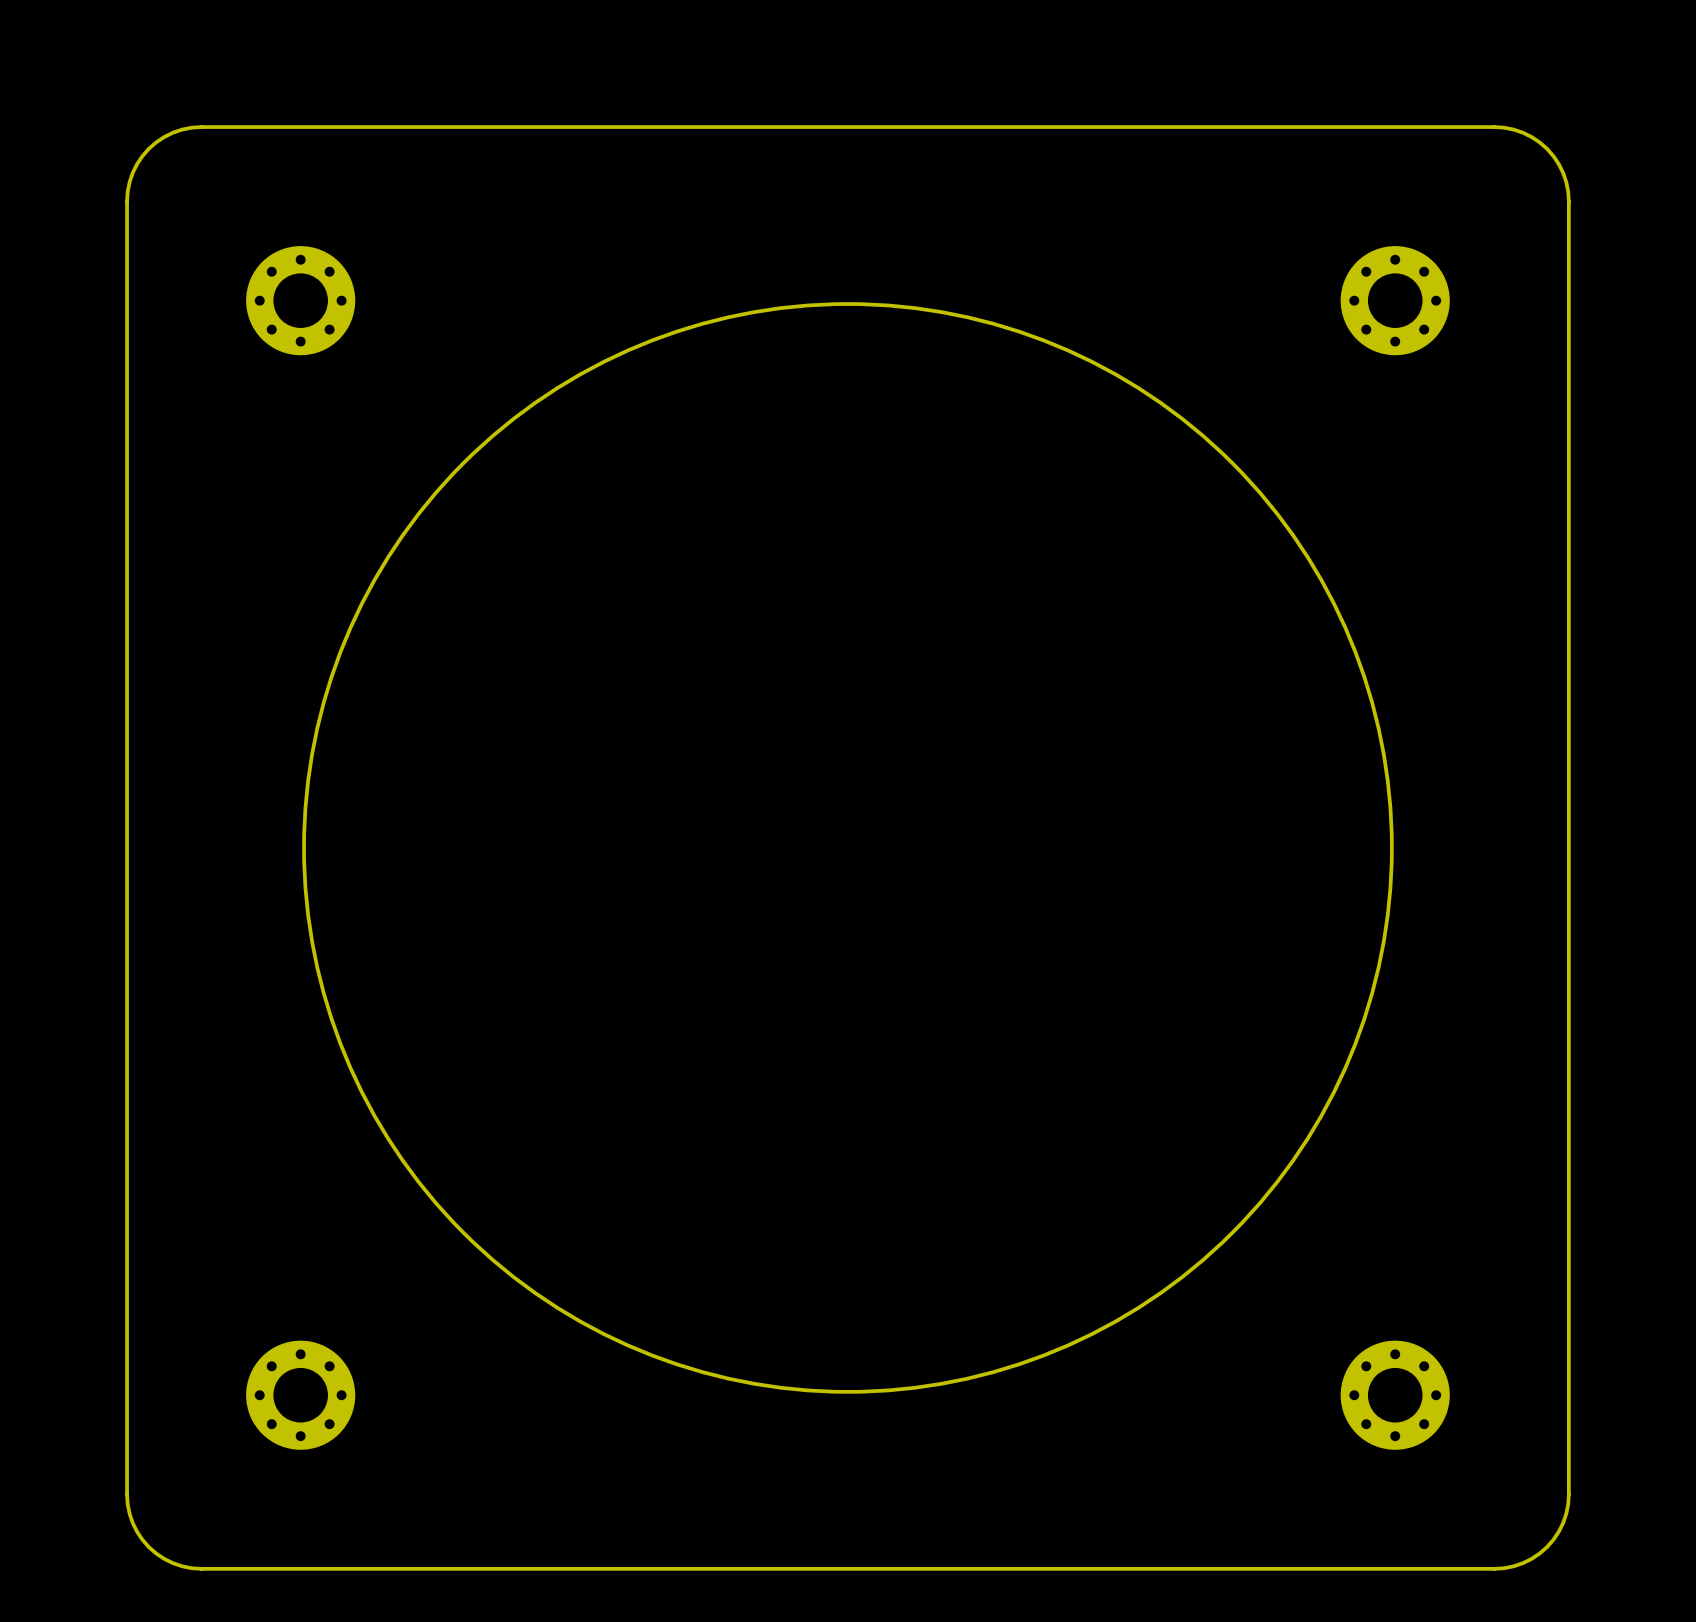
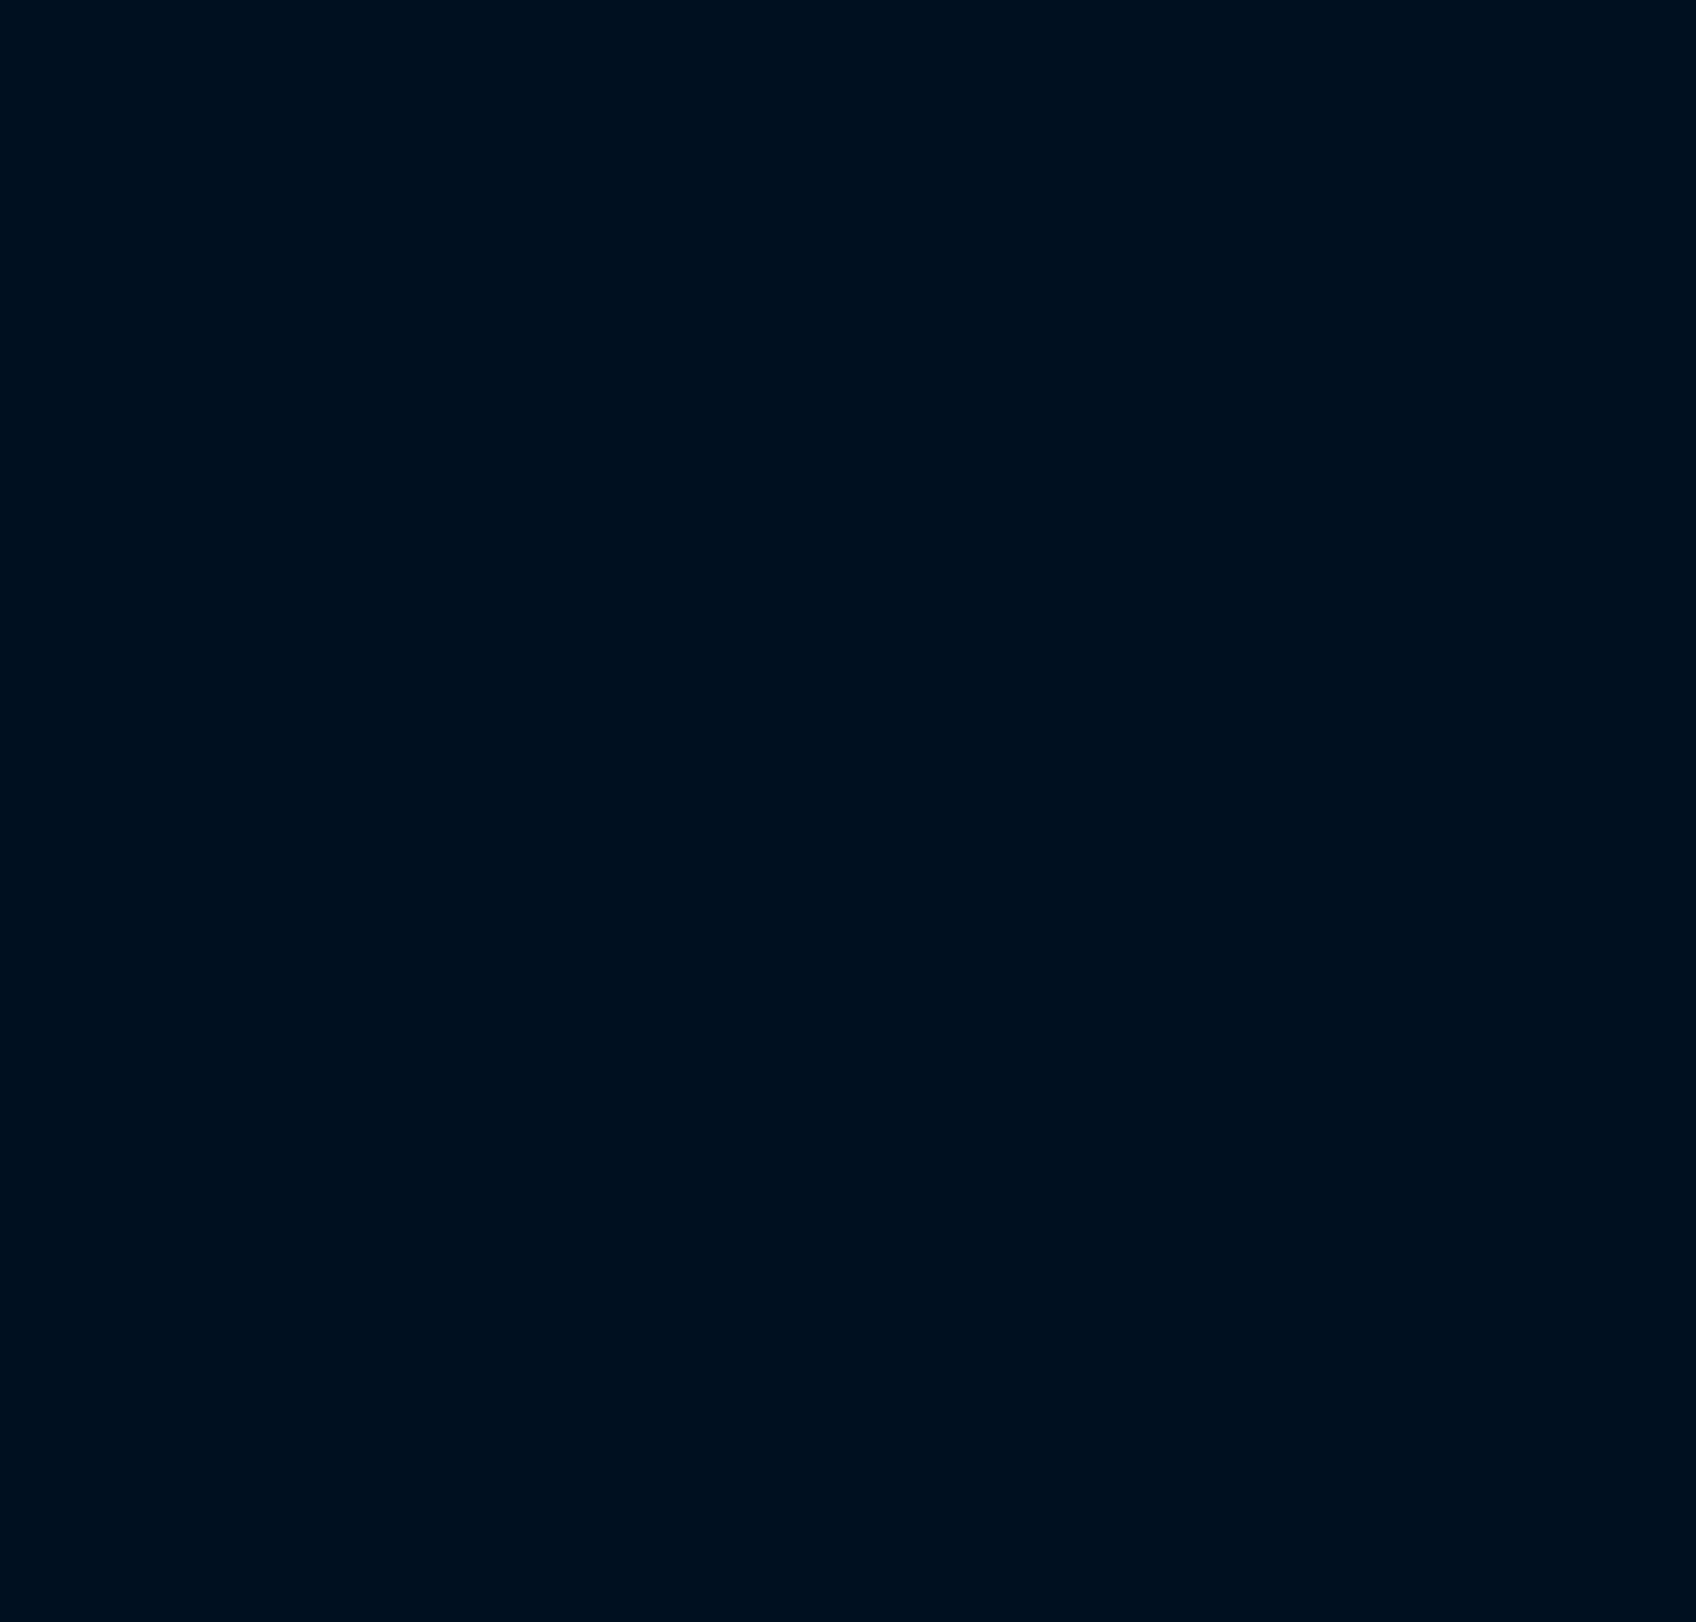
board edge: (201, 127) (1494, 127) (1522, 132) (1547, 148) (1563, 172) (1568, 201) (1568, 1494) (1563, 1522) (1547, 1547) (1522, 1563) (1494, 1568) (201, 1568) (172, 1563) (148, 1547) (132, 1522) (127, 1494) (127, 201) (132, 172) (148, 148) (172, 132) (201, 127) -> none
part: (300, 300) -> none
part: (1395, 300) -> none
round board edge: [302, 302, 1394, 1394] -> none
part: (300, 1395) -> none
part: (1395, 1395) -> none

